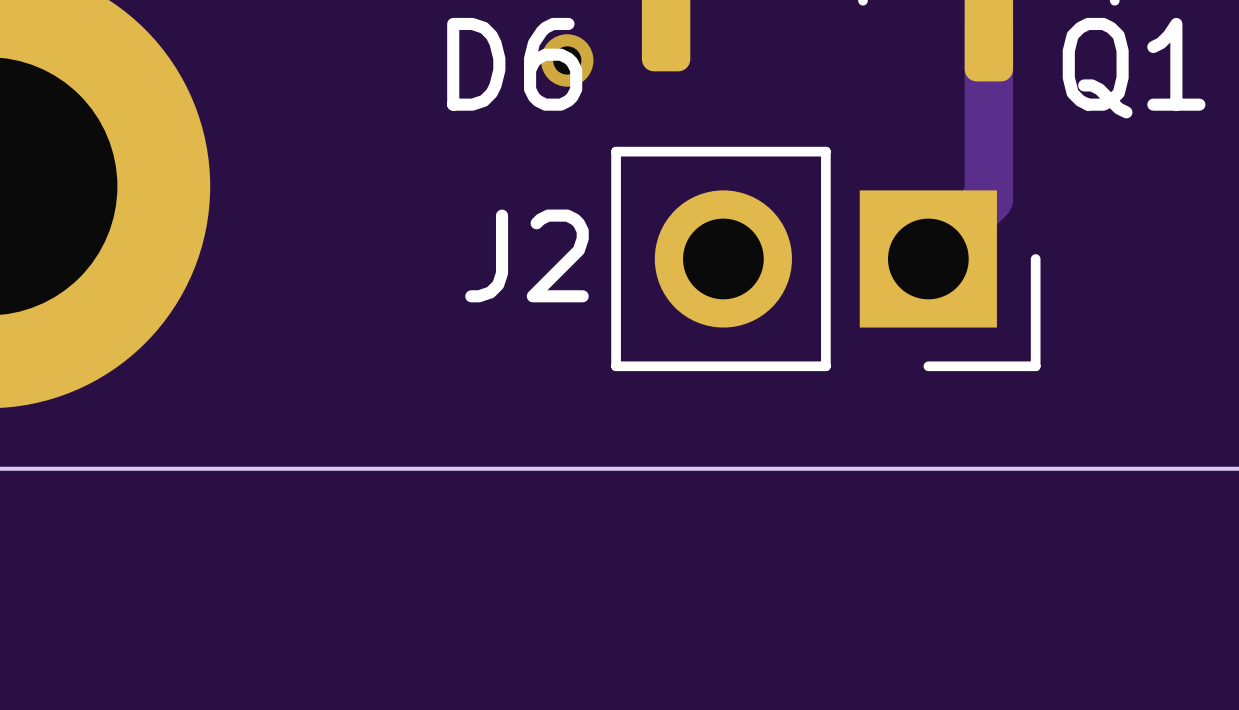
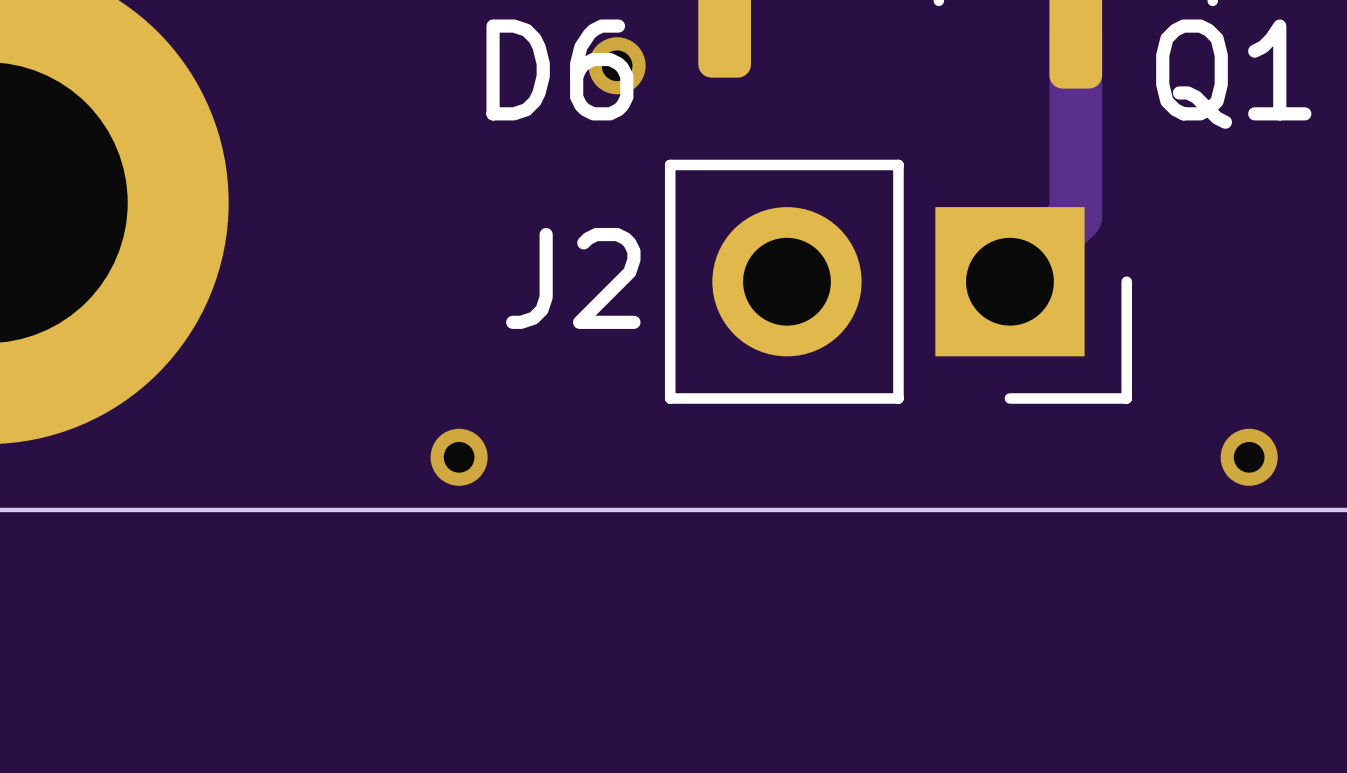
via: none -> (459, 457)
via: none -> (1249, 457)

